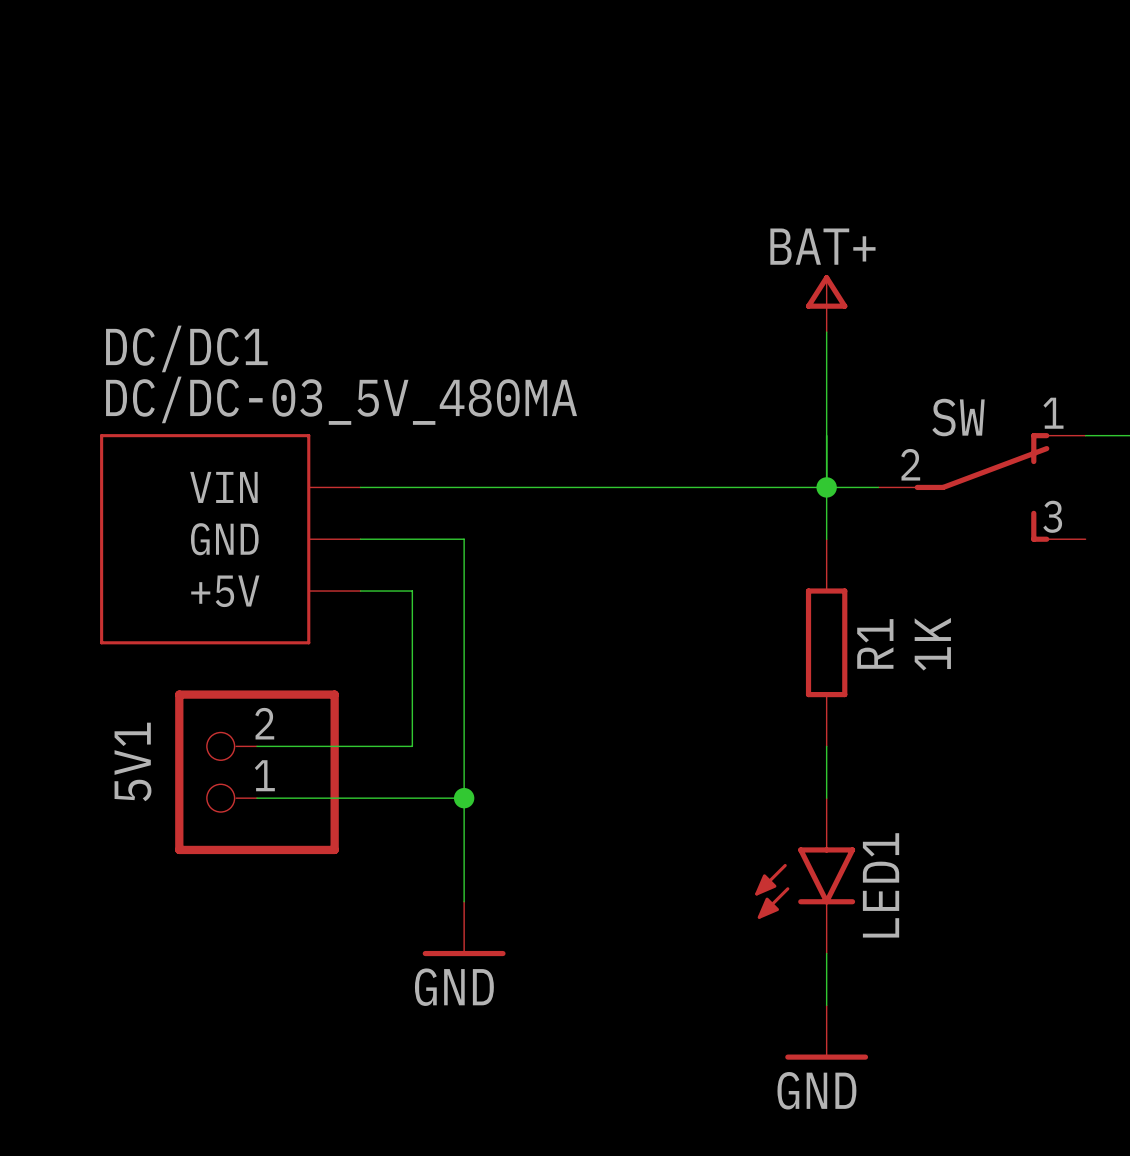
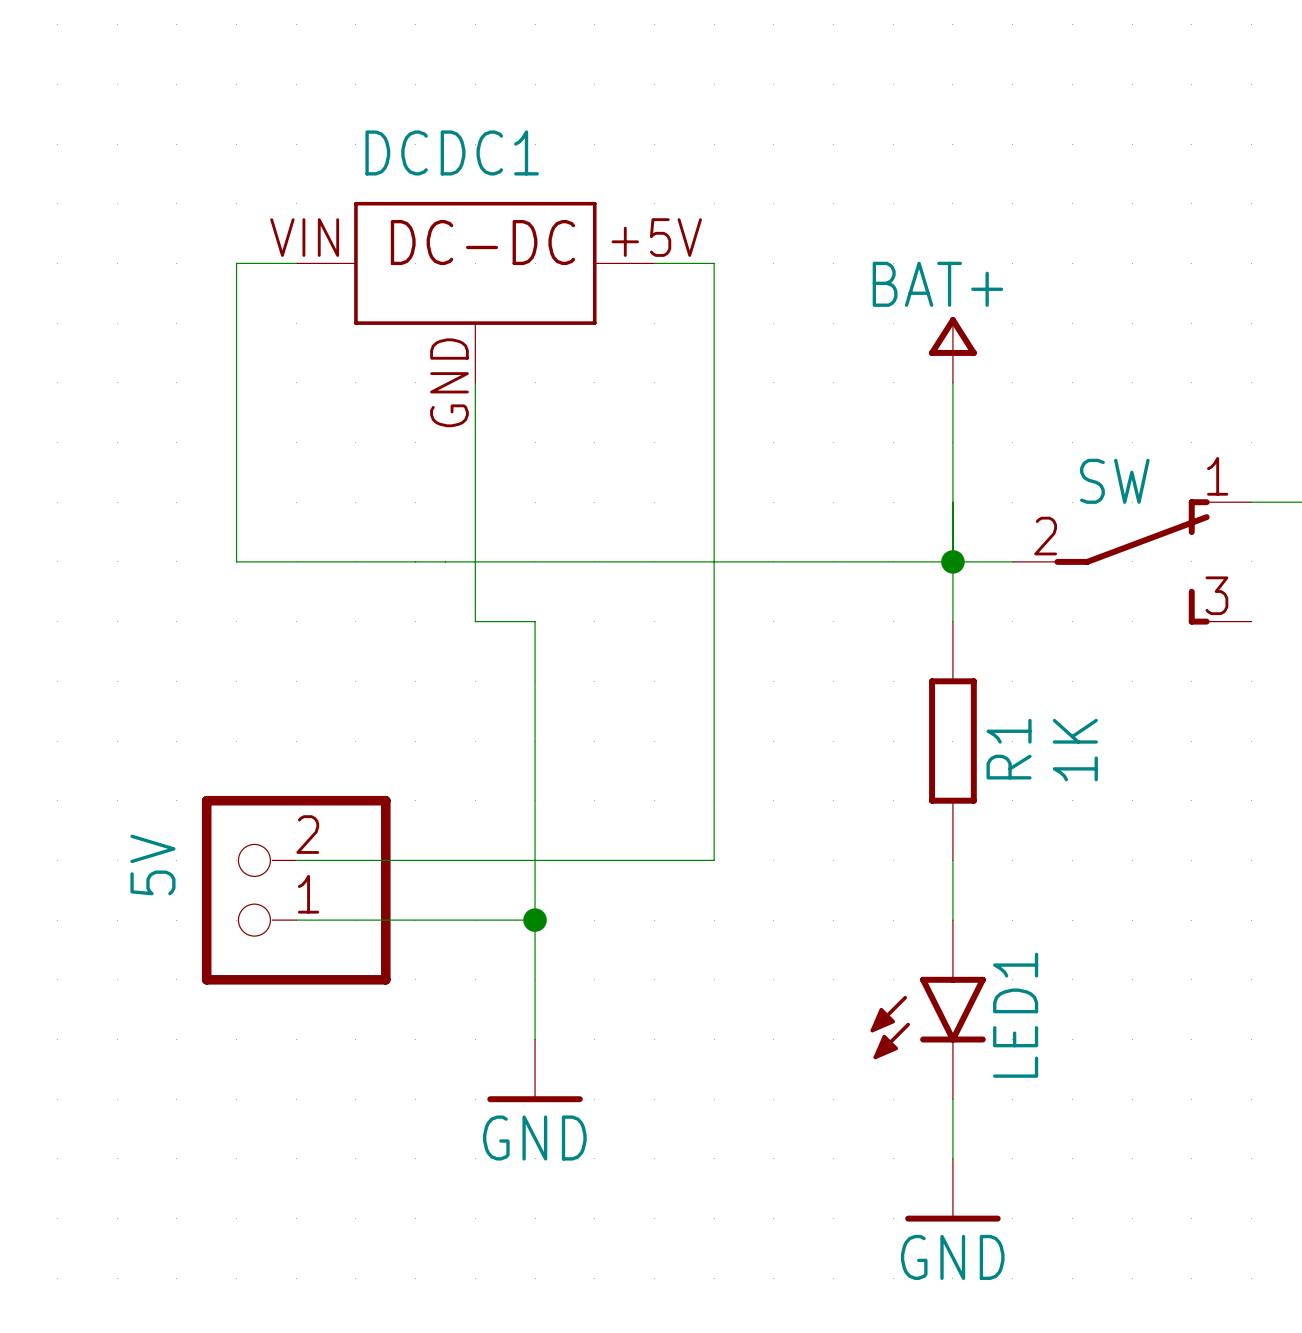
wire: none -> (296, 263) (236, 263) (236, 561) (415, 561)
DCDC1: none -> (475, 292)
DC/DC1: DC/DC-03_5V_480MA (230, 539) -> none
wire: (360, 539) (412, 539) -> (475, 382) (475, 621)
wire: (360, 591) (412, 591) (412, 746) -> (654, 263) (714, 263) (714, 860) (475, 860)
5V1 name: 5V1 (133, 761) -> 5V (152, 864)

